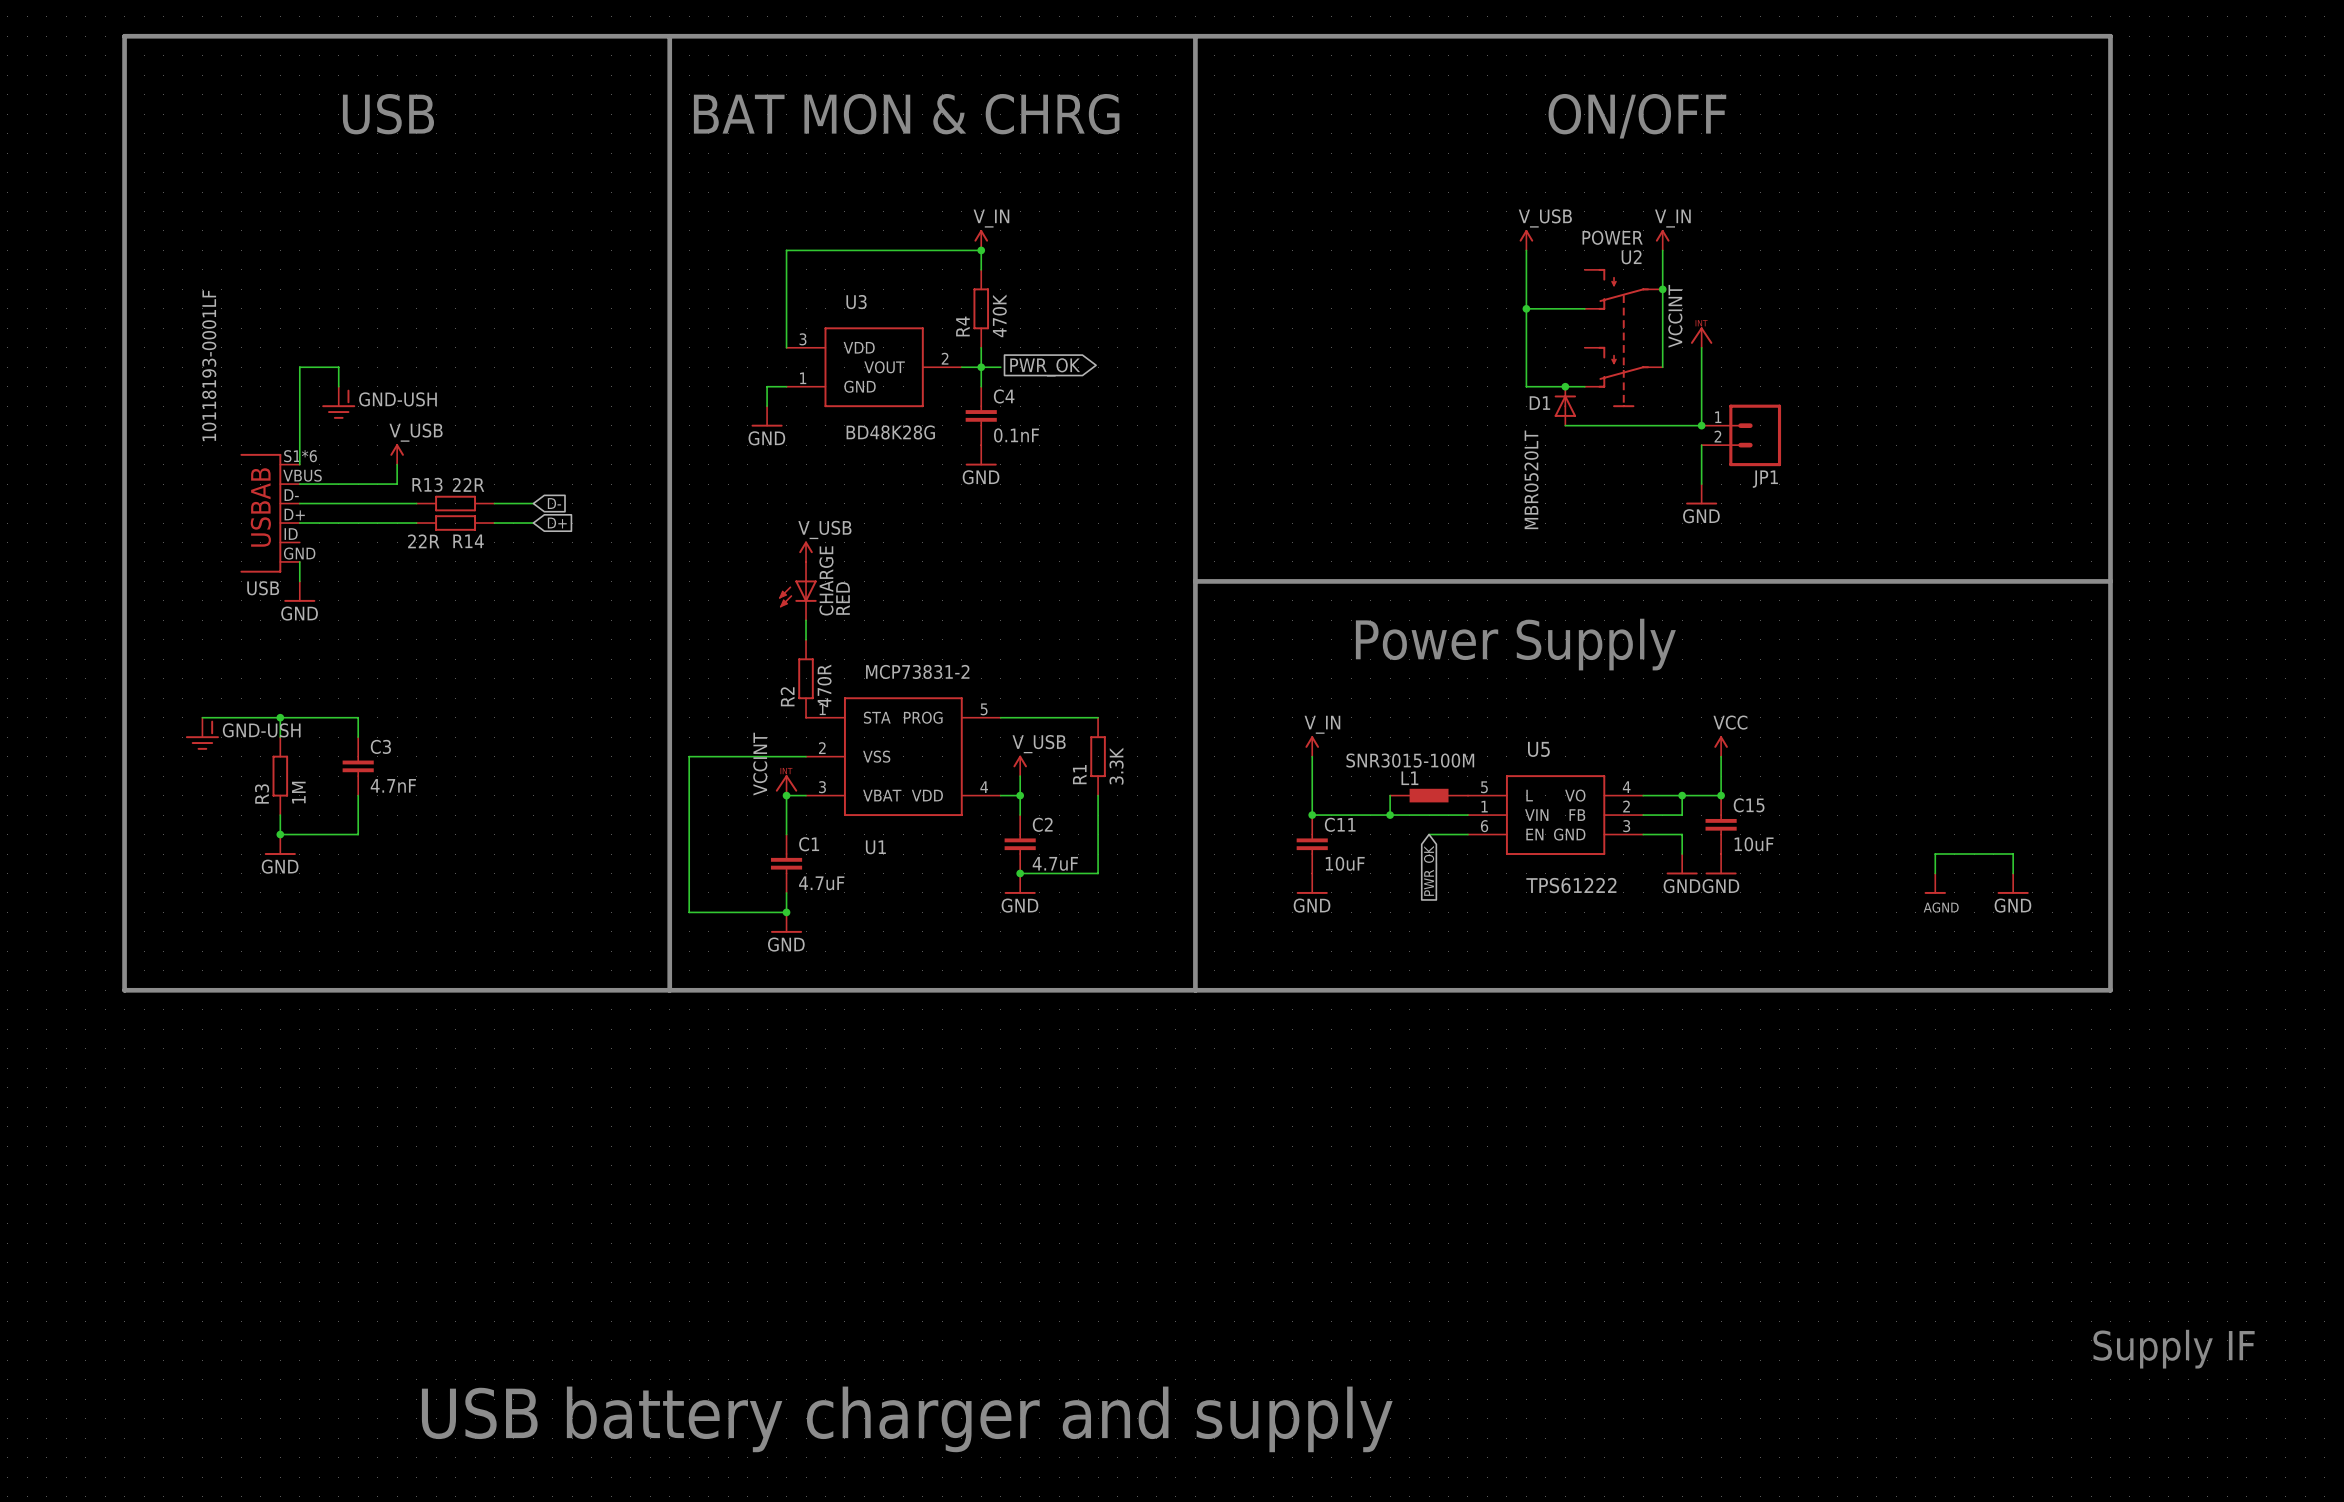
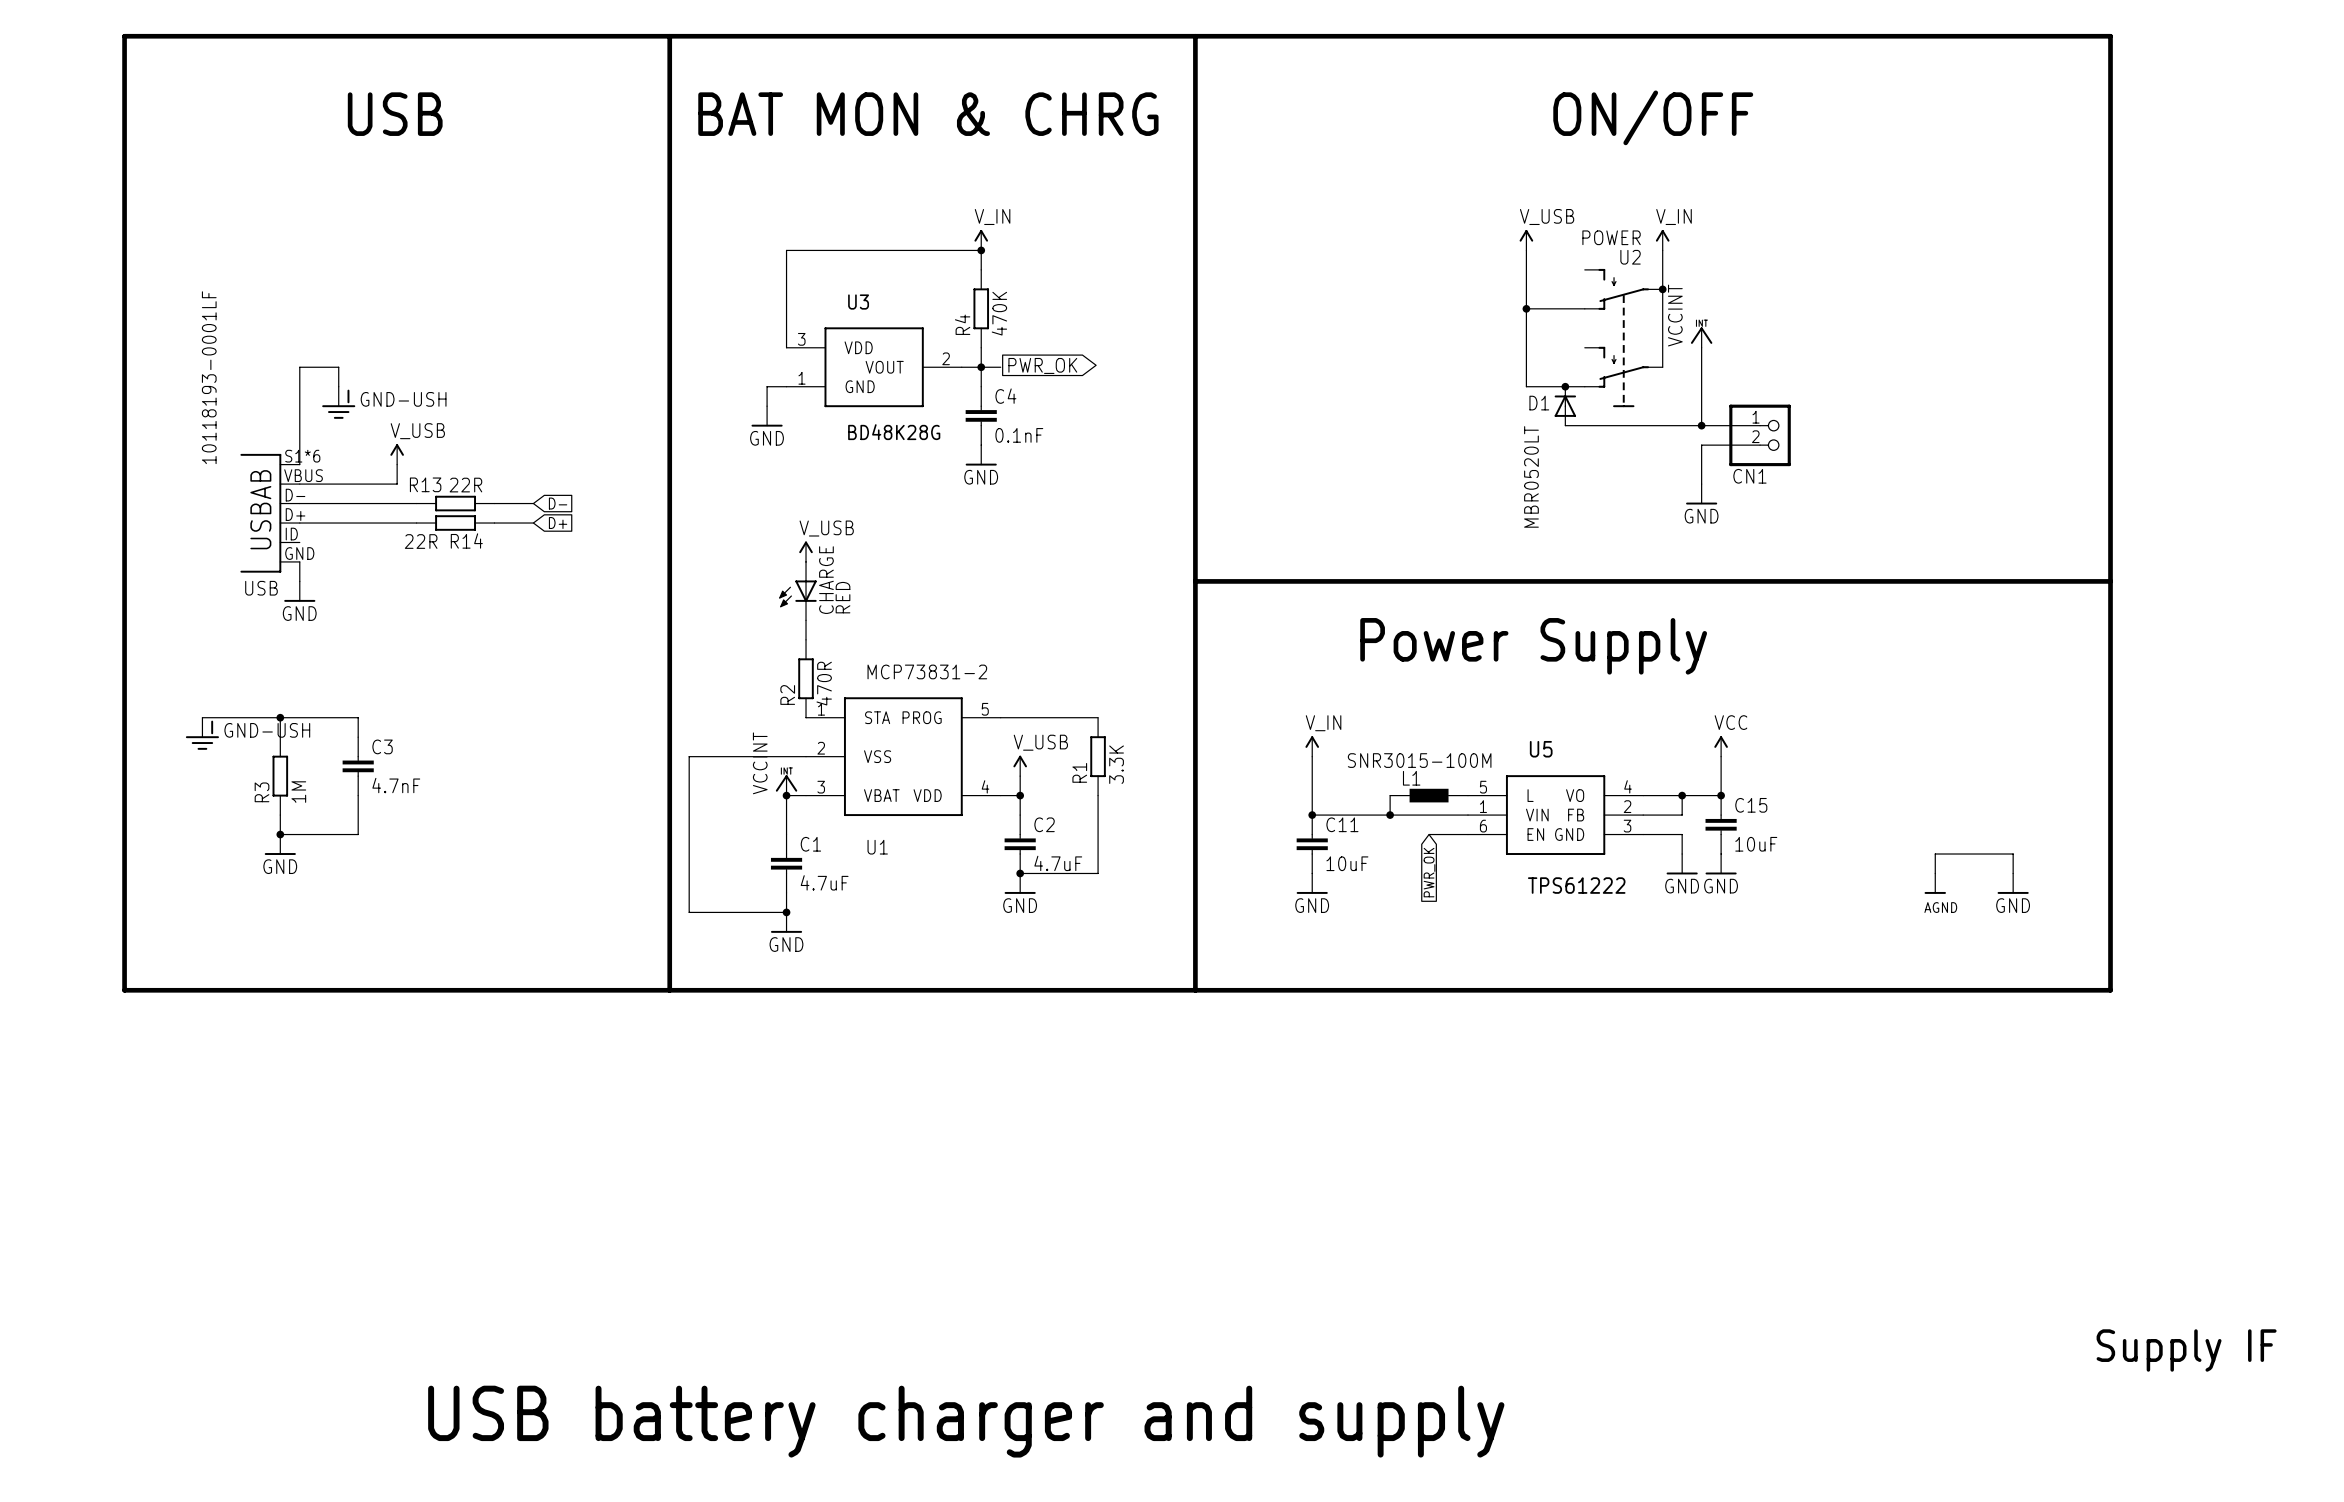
JP1: (1741, 435) -> none
CN1: none -> (1760, 435)

